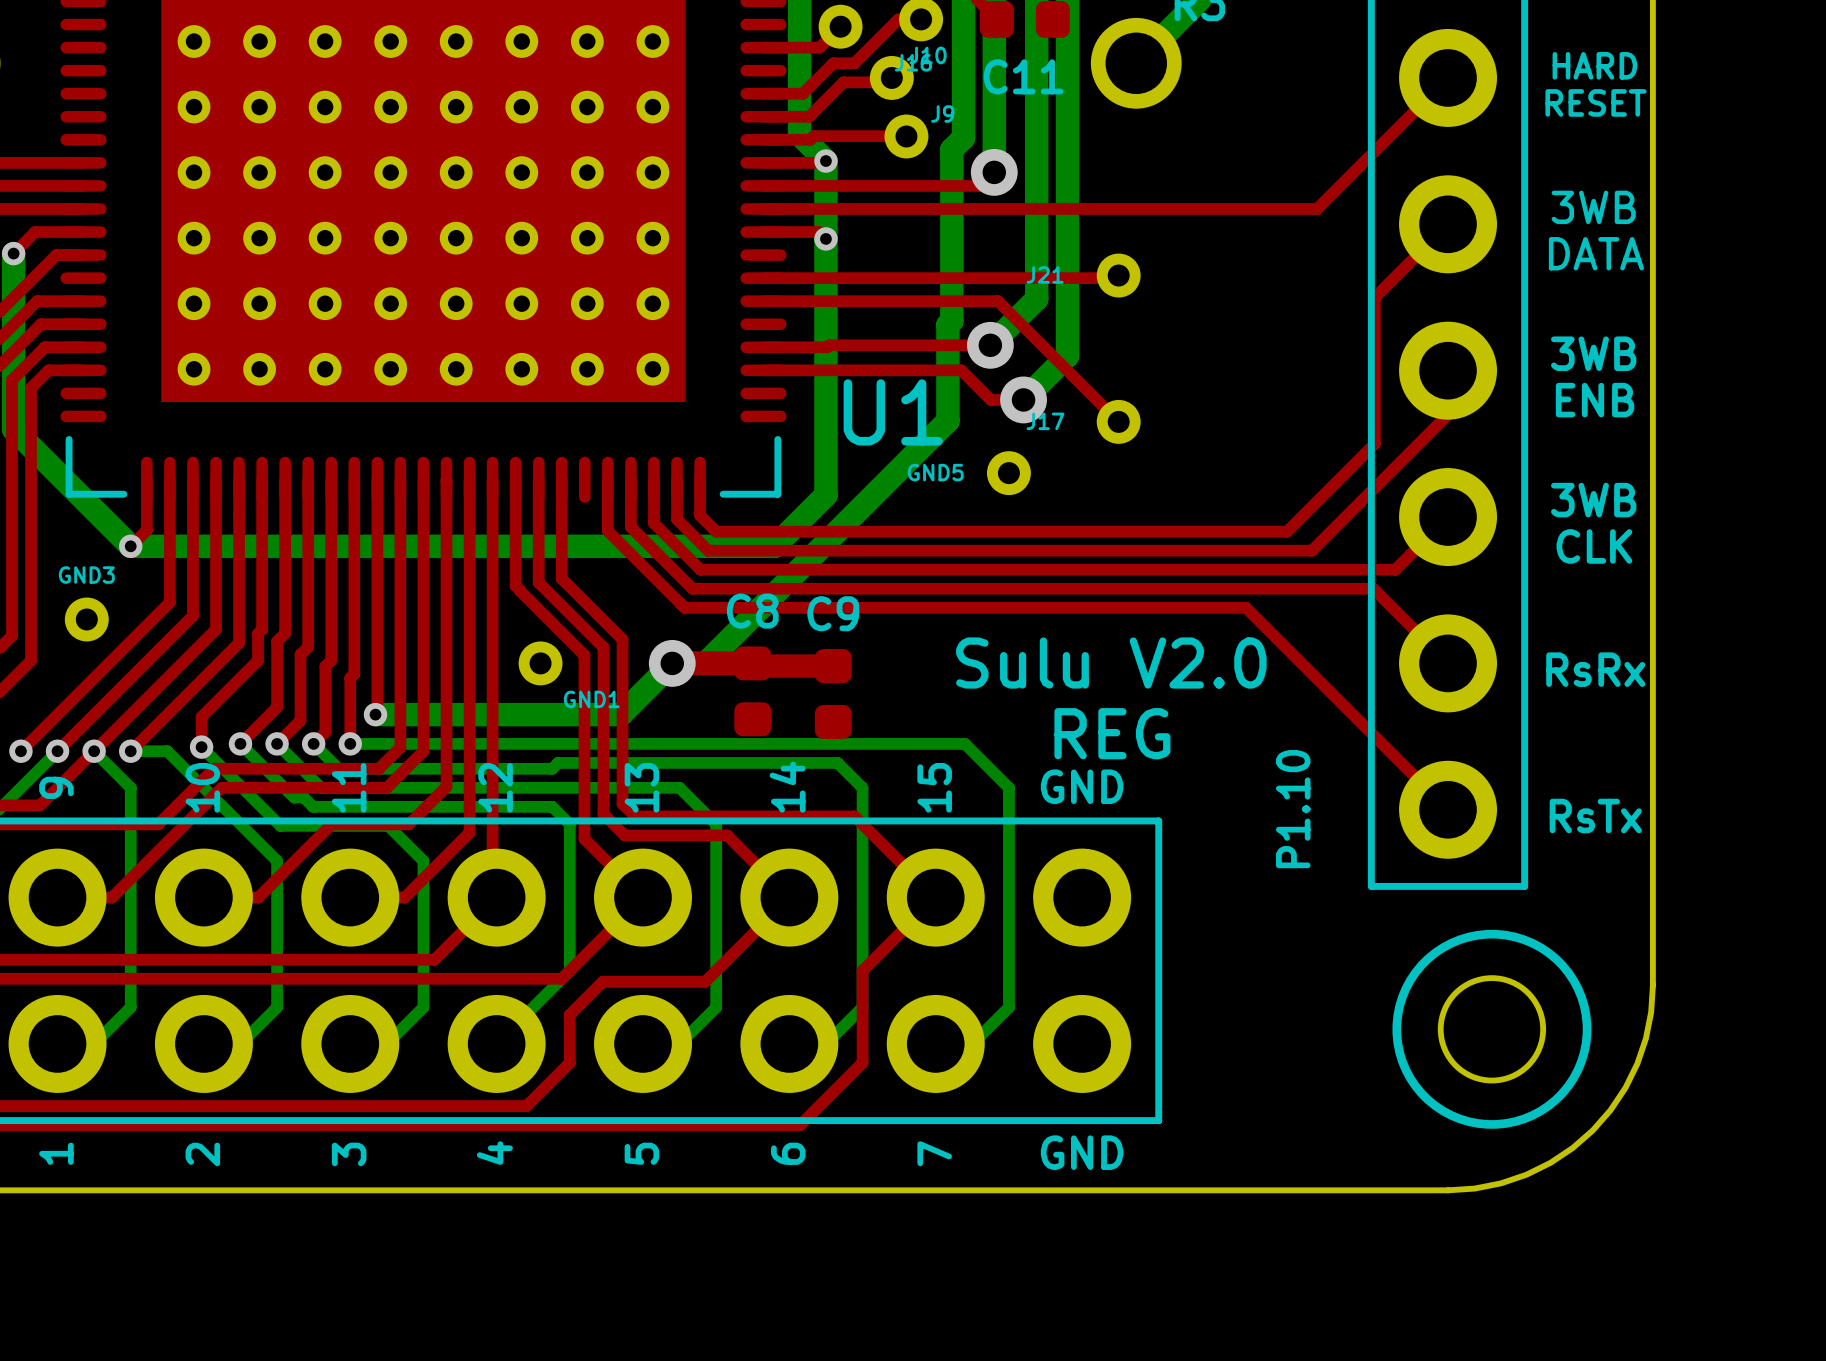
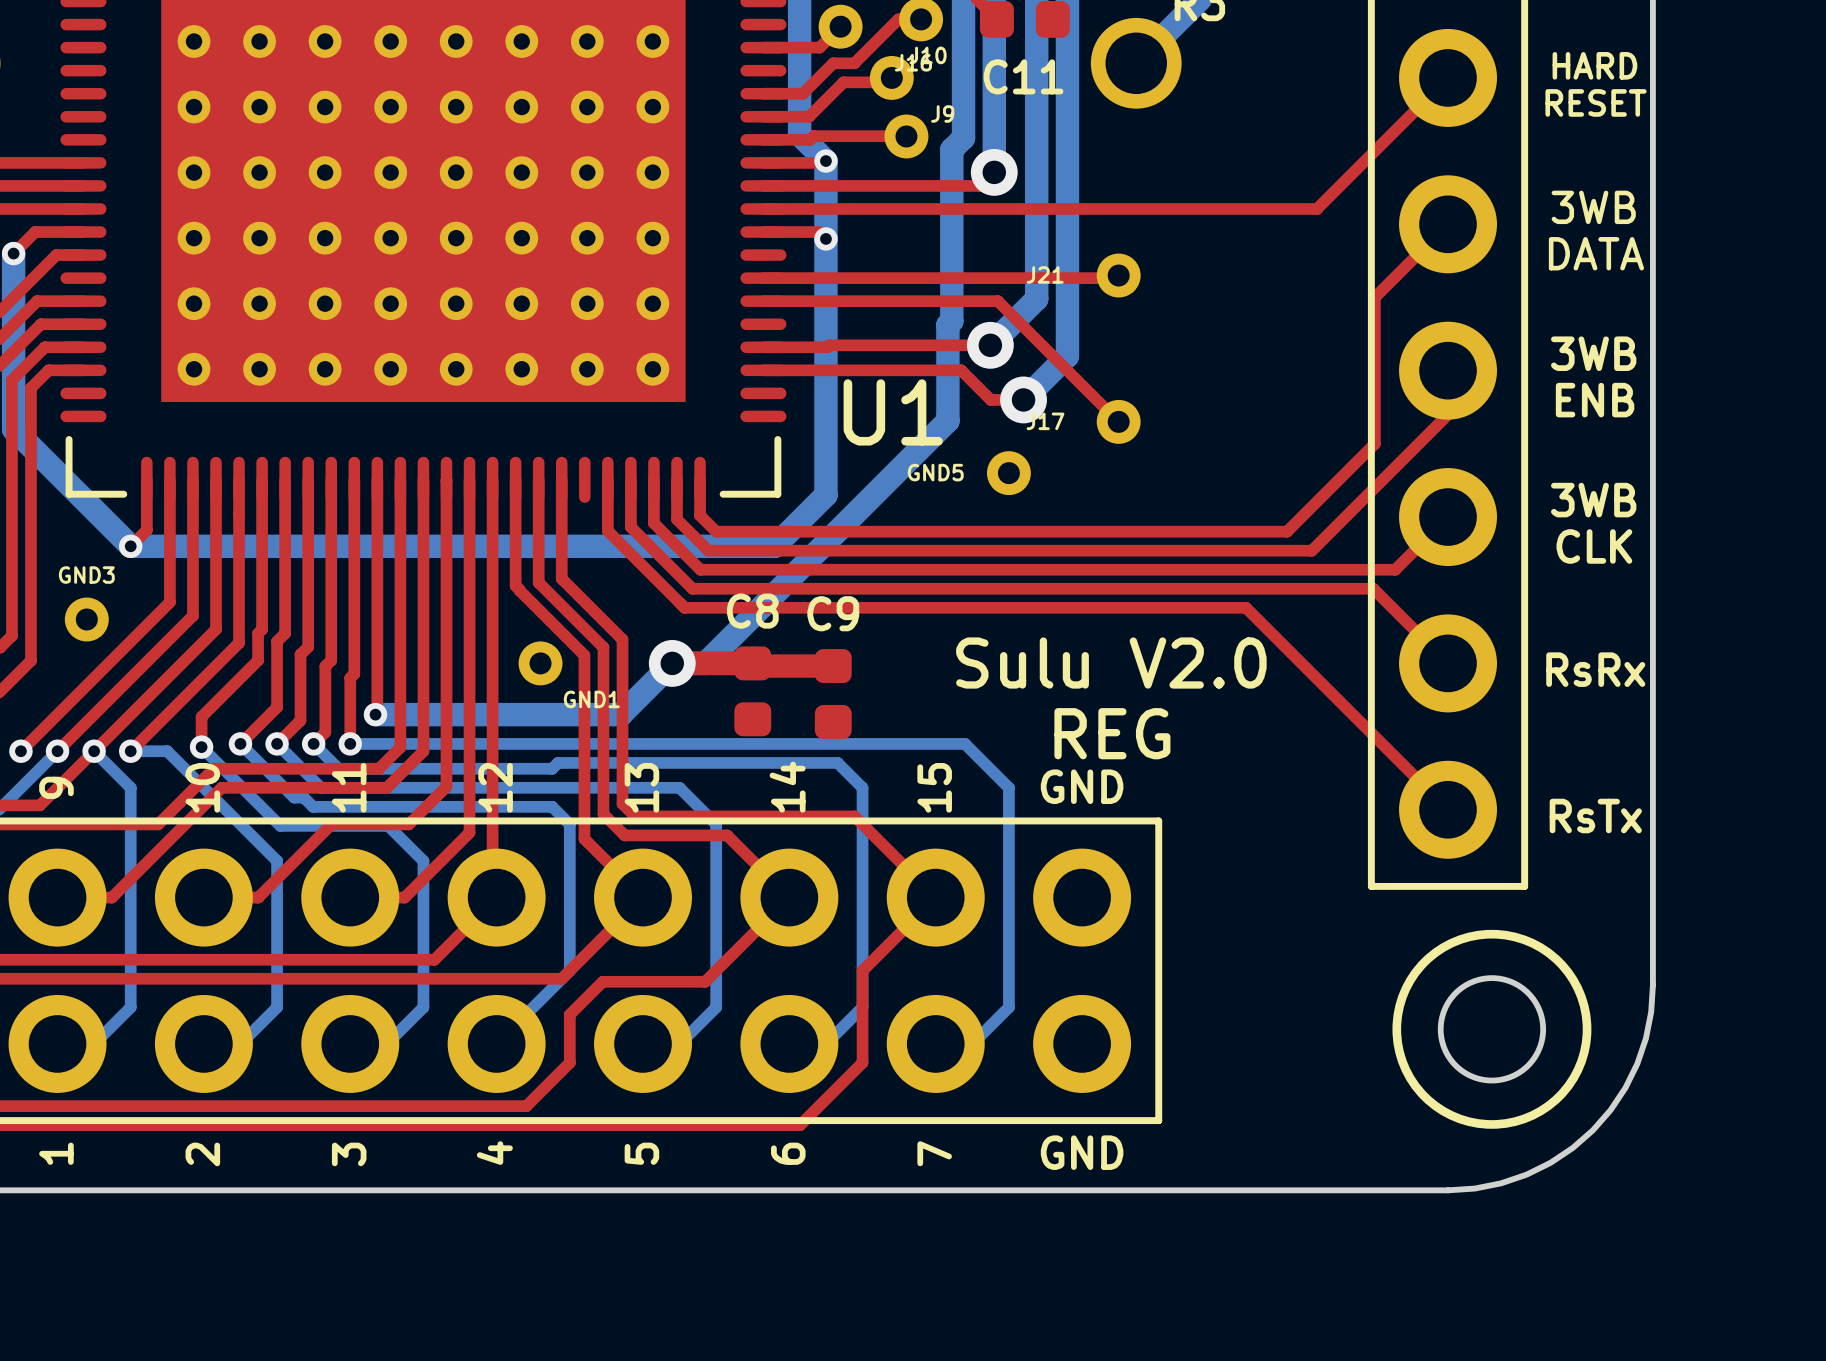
text: P1.10 (1293, 809) -> none

